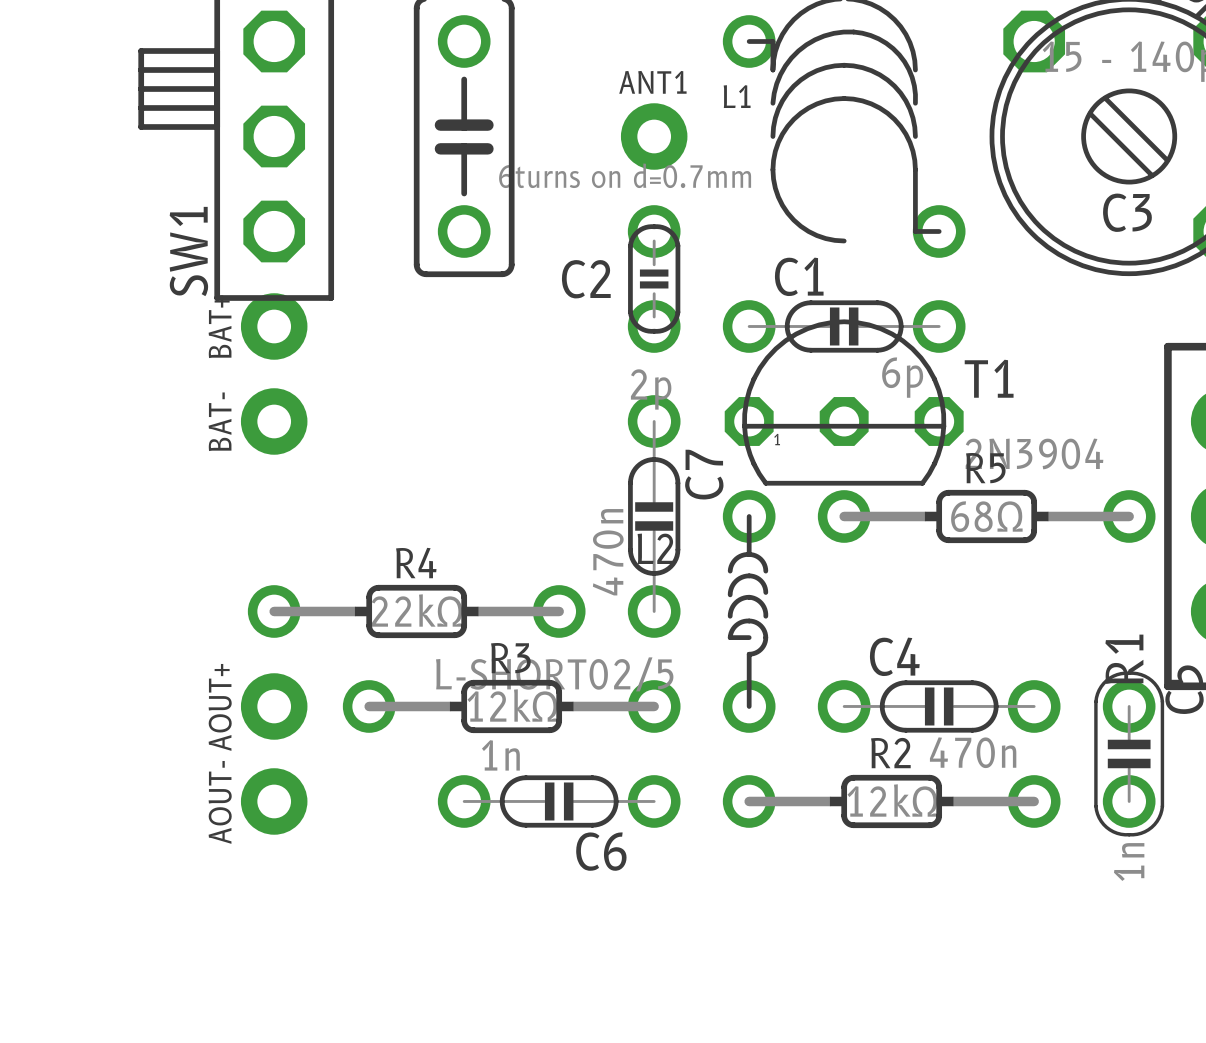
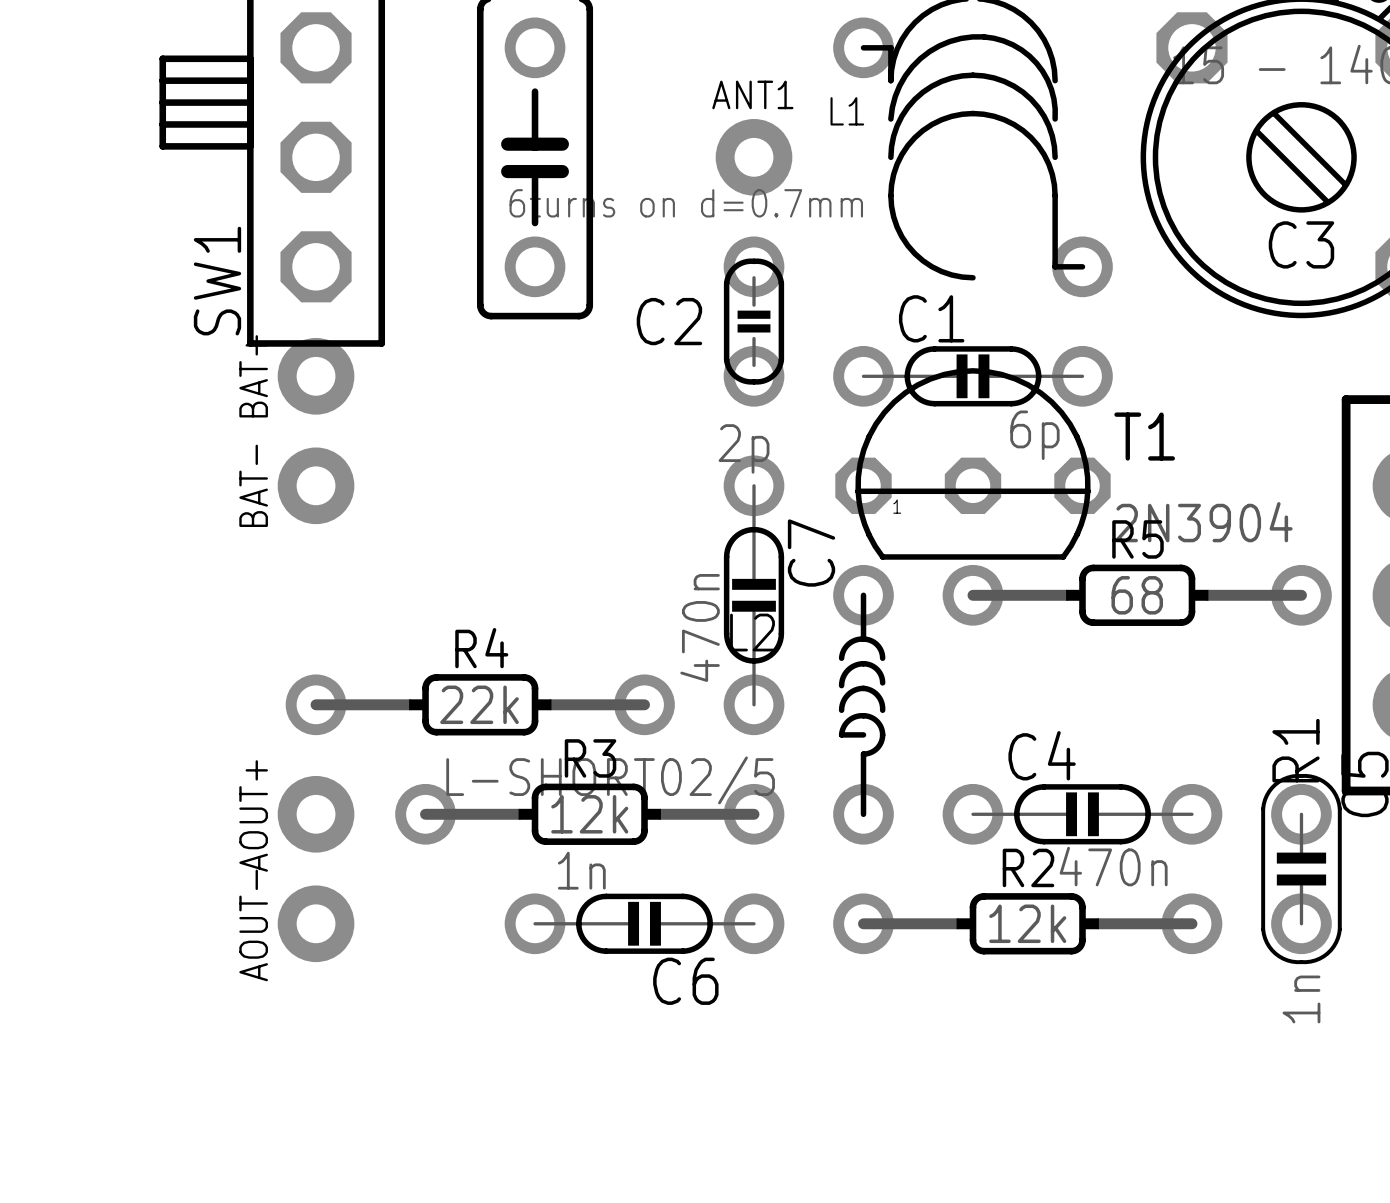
R5 value: 68Ω (986, 516) -> 68 (1137, 595)
R4 value: 22kΩ (417, 610) -> 22k (479, 704)
R3 value: 12kΩ (512, 705) -> 12k (589, 814)
R2 value: 12kΩ (892, 800) -> 12k (1027, 923)

